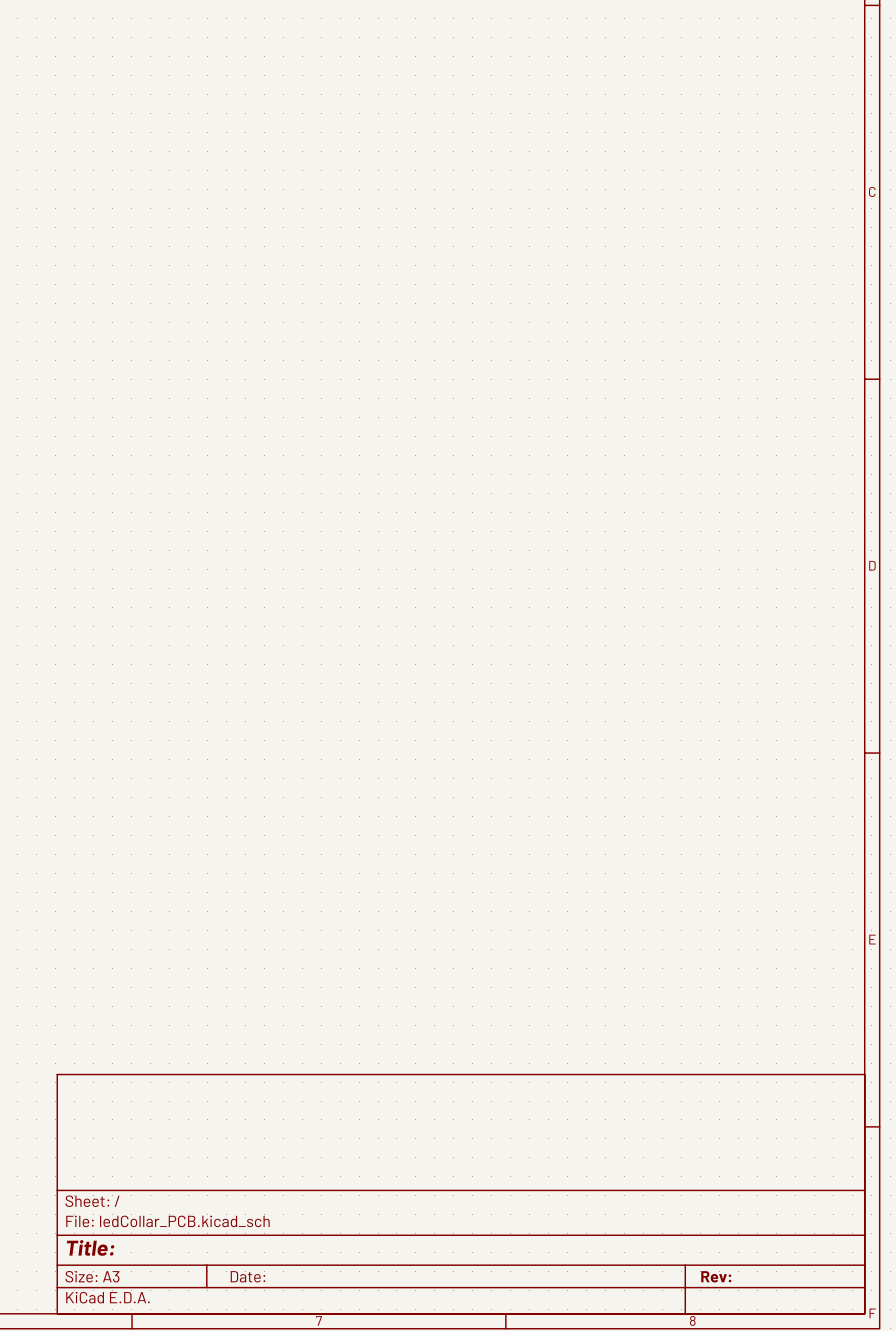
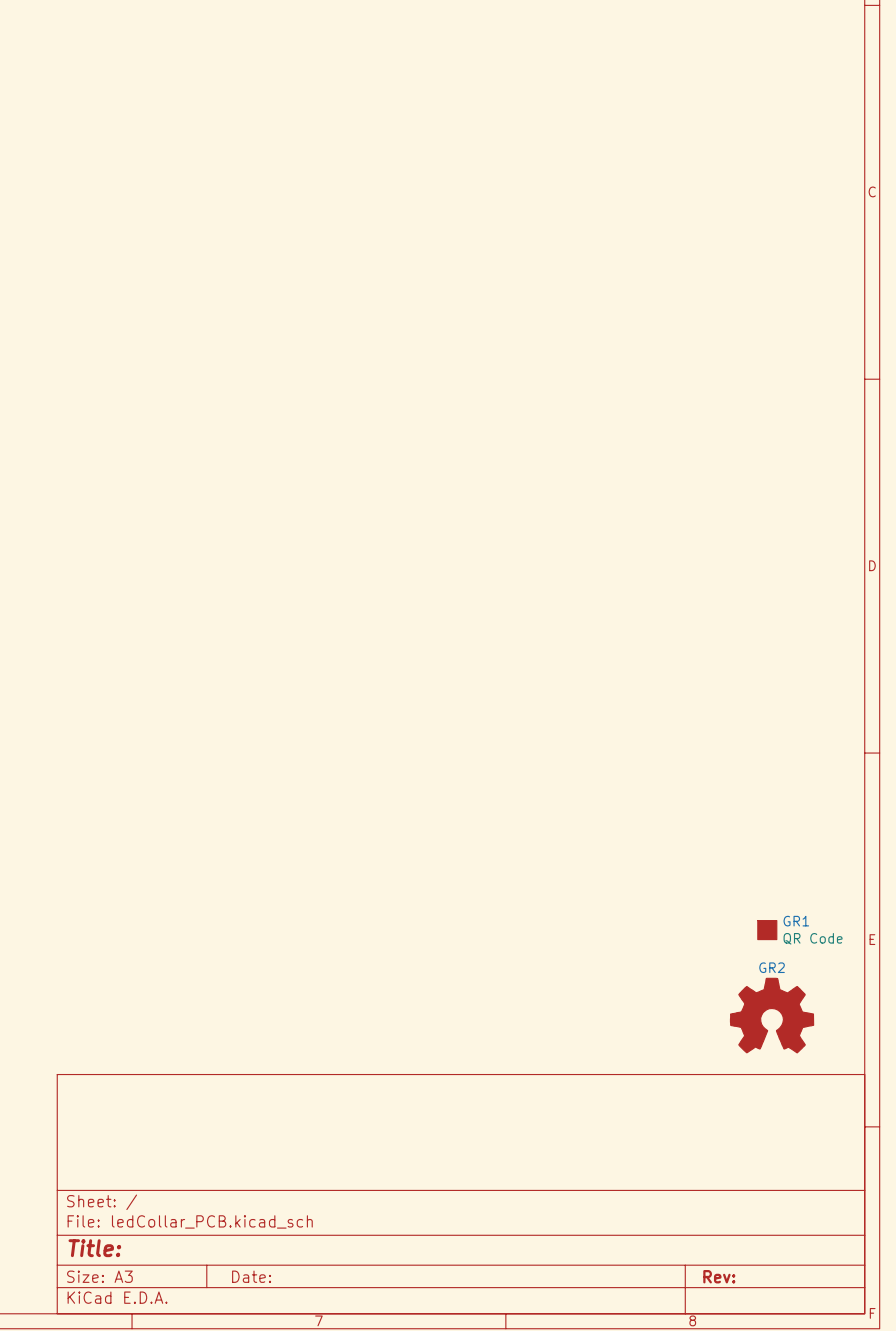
GR1: none -> QR Code (767, 930)
GR2: none -> (772, 1015)

